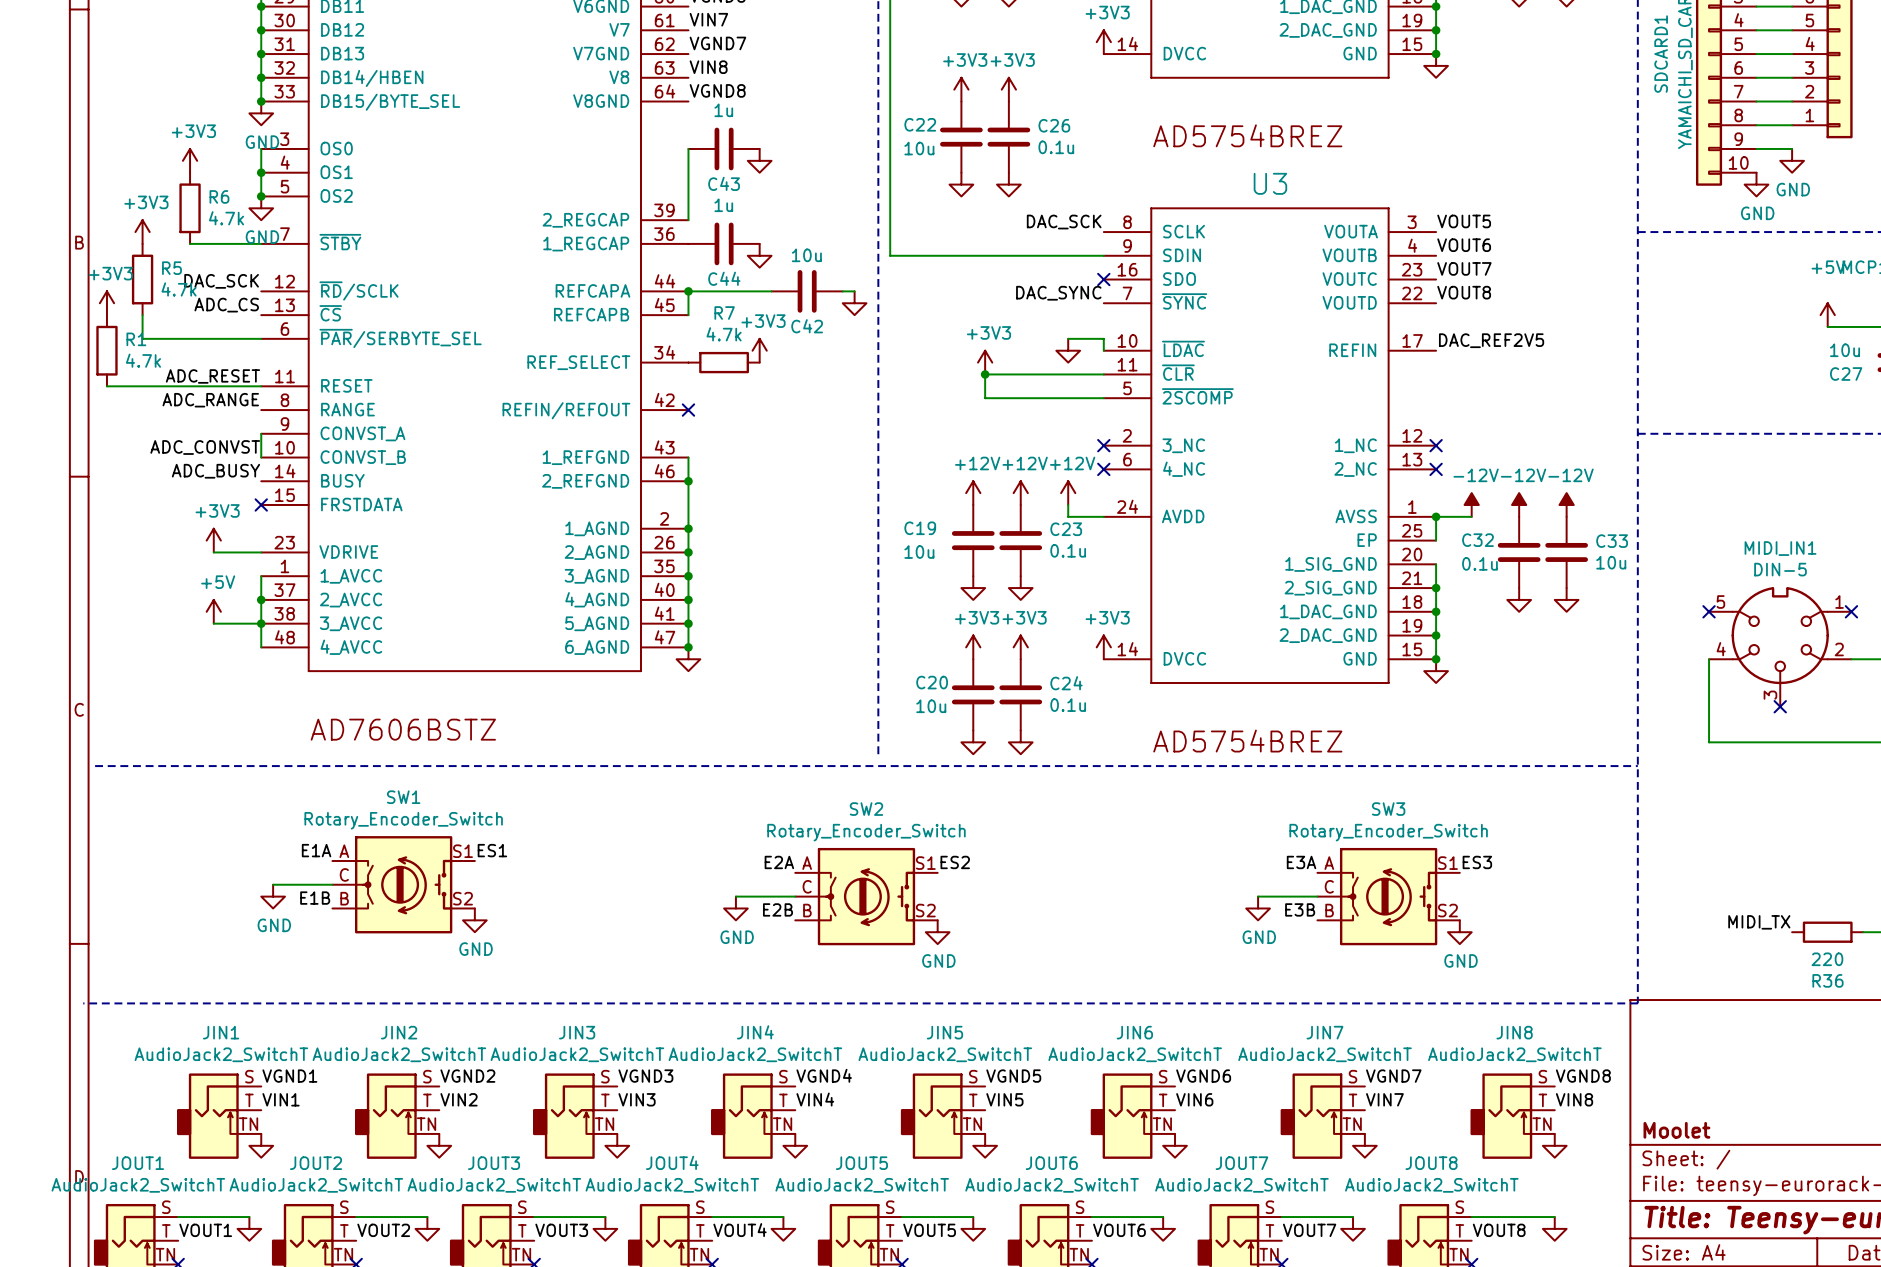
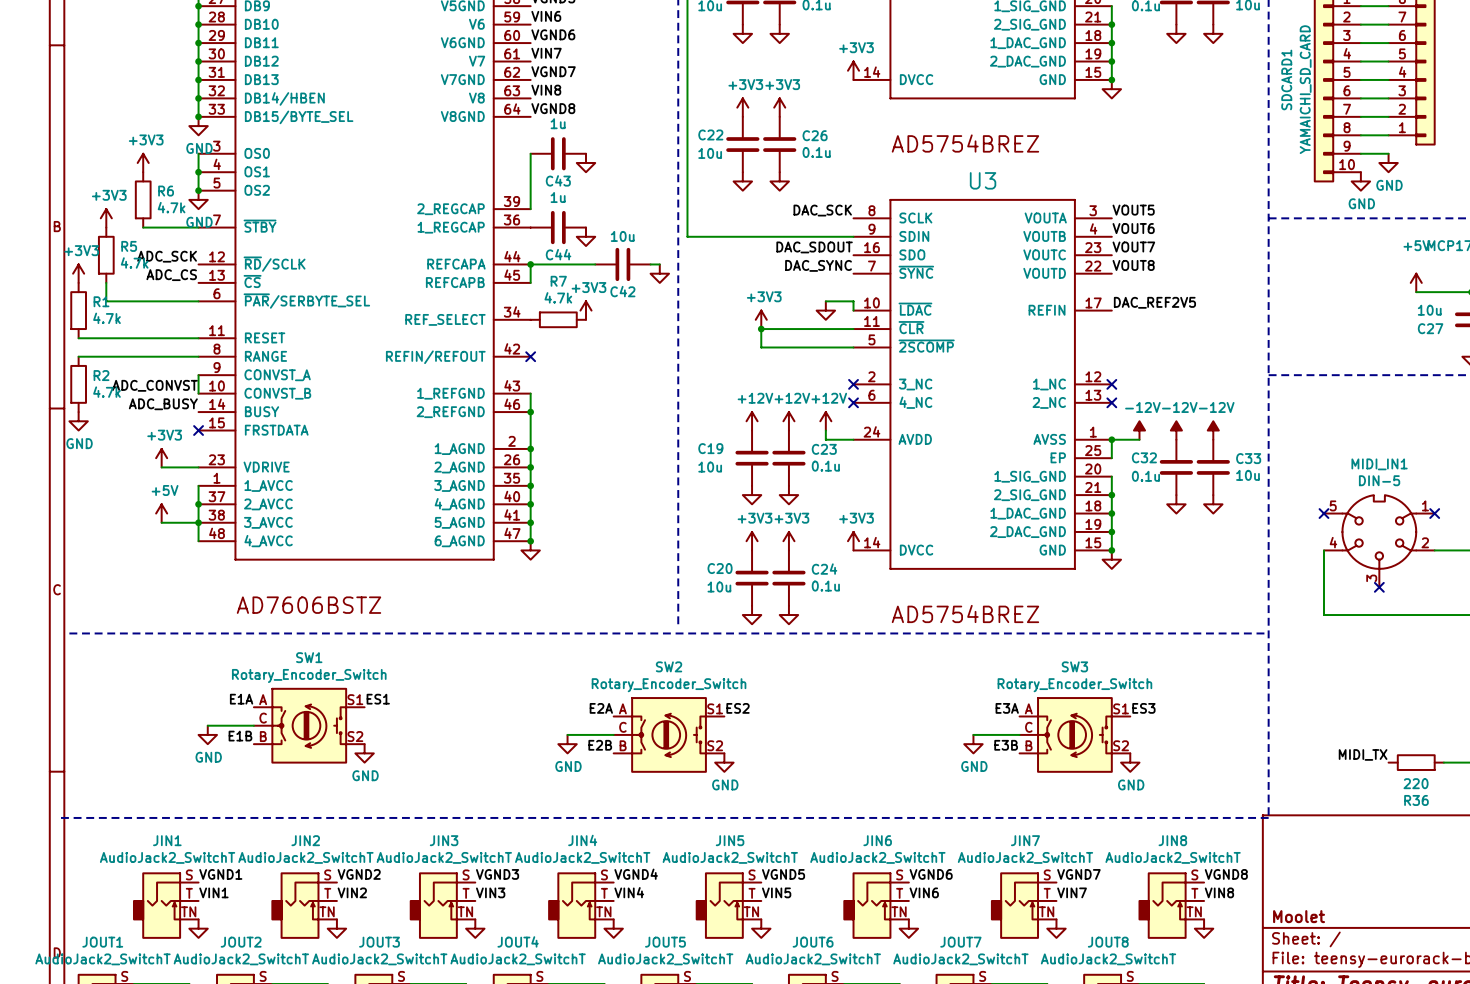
label: none -> DAC_SDOUT (814, 247)
no-connect mark: (1103, 279) -> none
label: DAC_SCK (221, 281) -> ADC_SCK (167, 256)
label: ADC_RESET (212, 376) -> none
label: ADC_RANGE (210, 400) -> none
wire: none -> (78, 356) (198, 356)
R2: none -> 4.7k (78, 384)
power symbol: none -> GND (78, 421)

